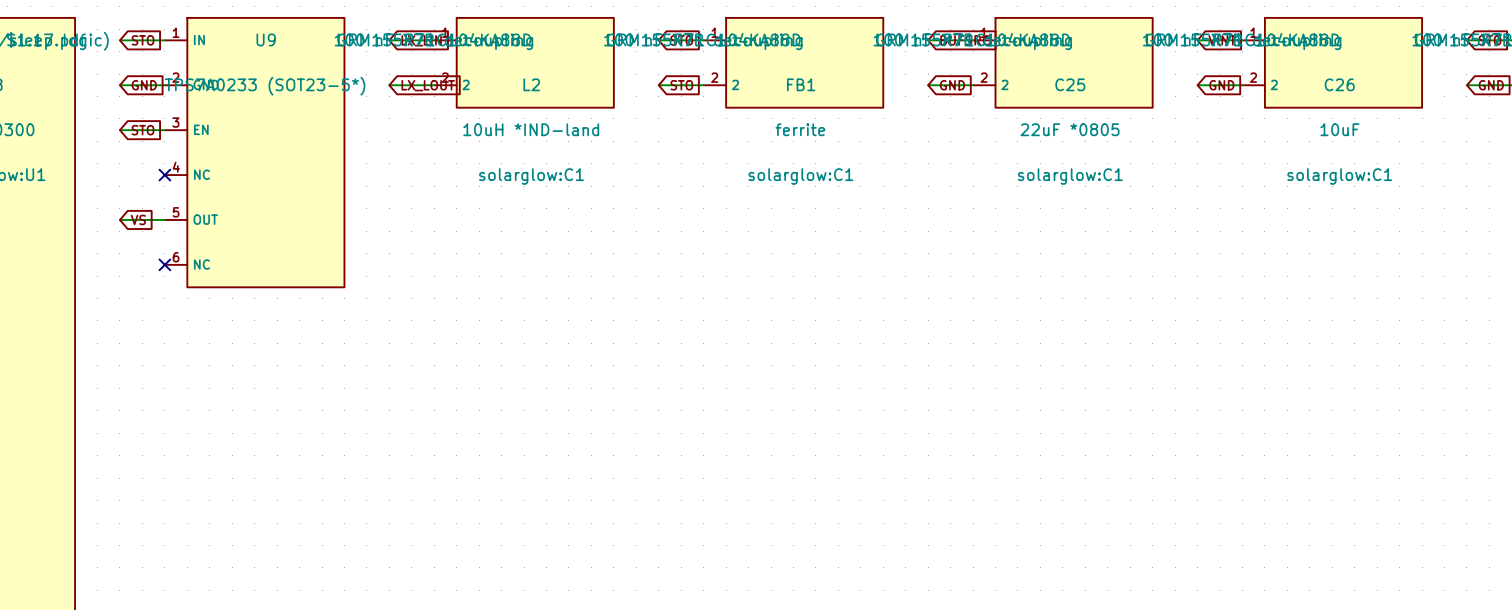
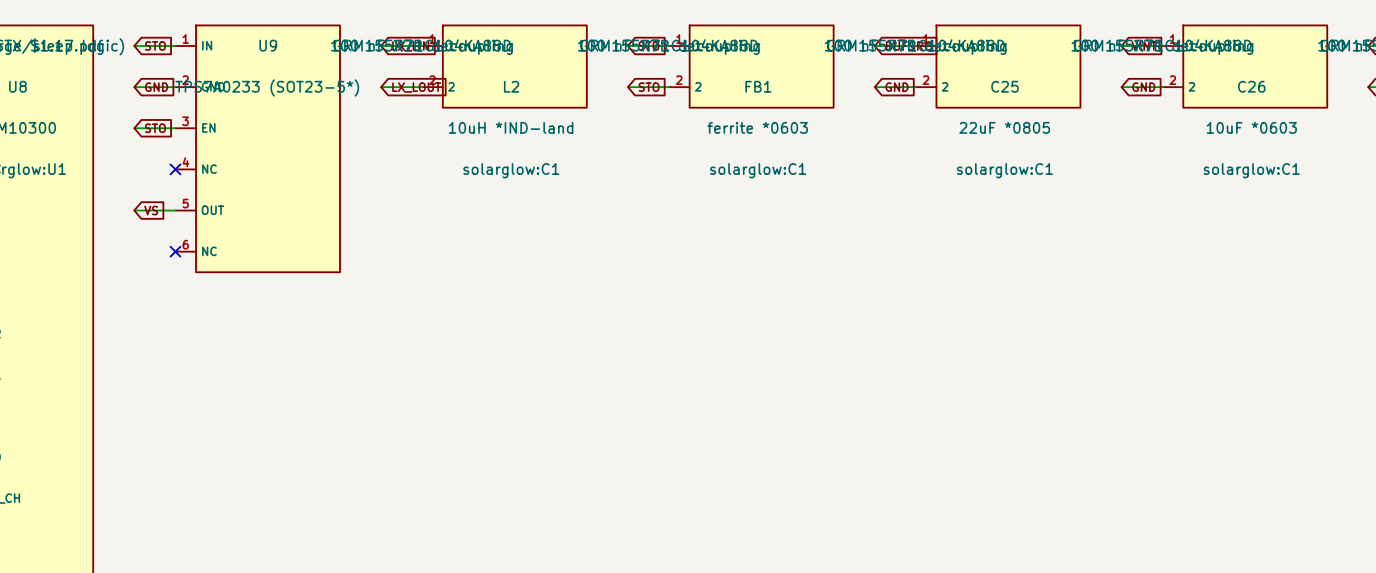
FB1 value: ferrite (800, 129) -> ferrite *0603 (757, 127)
C26 value: 10uF (1339, 129) -> 10uF *0603 (1251, 127)

